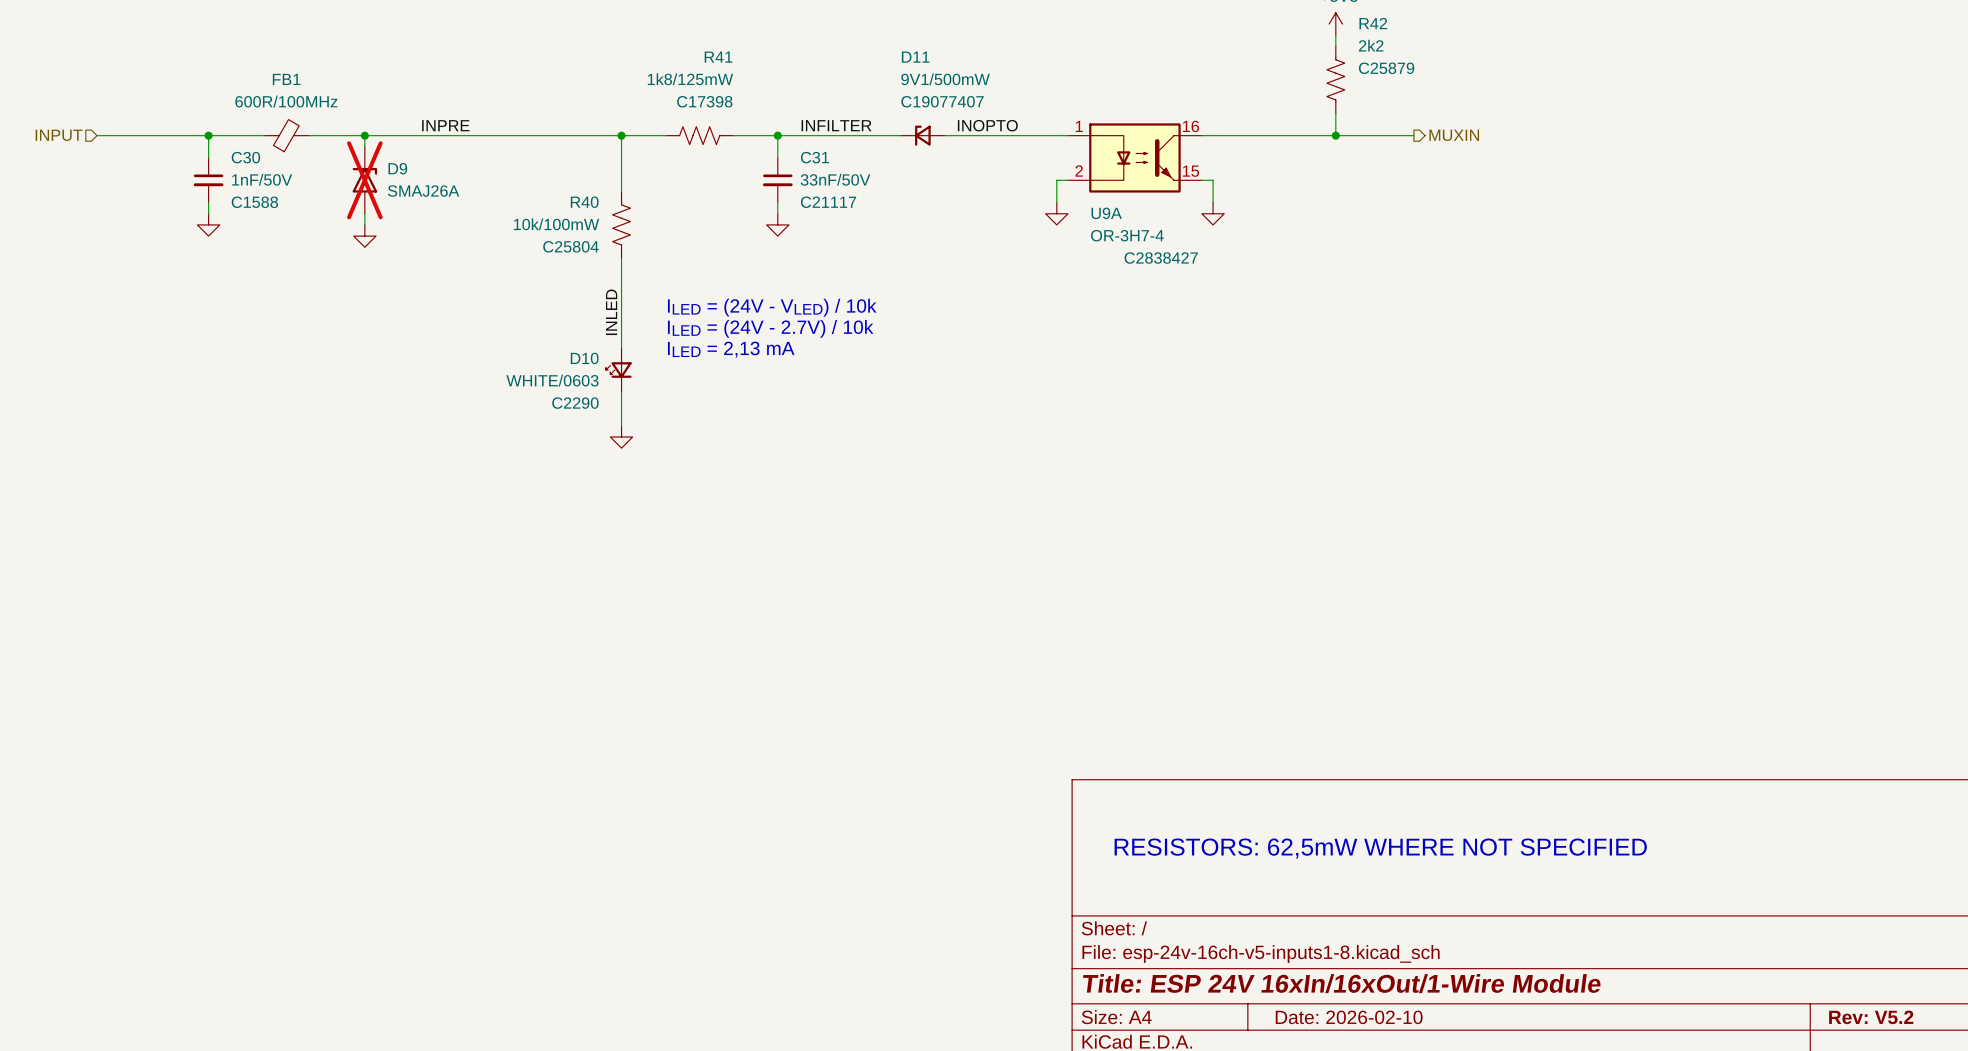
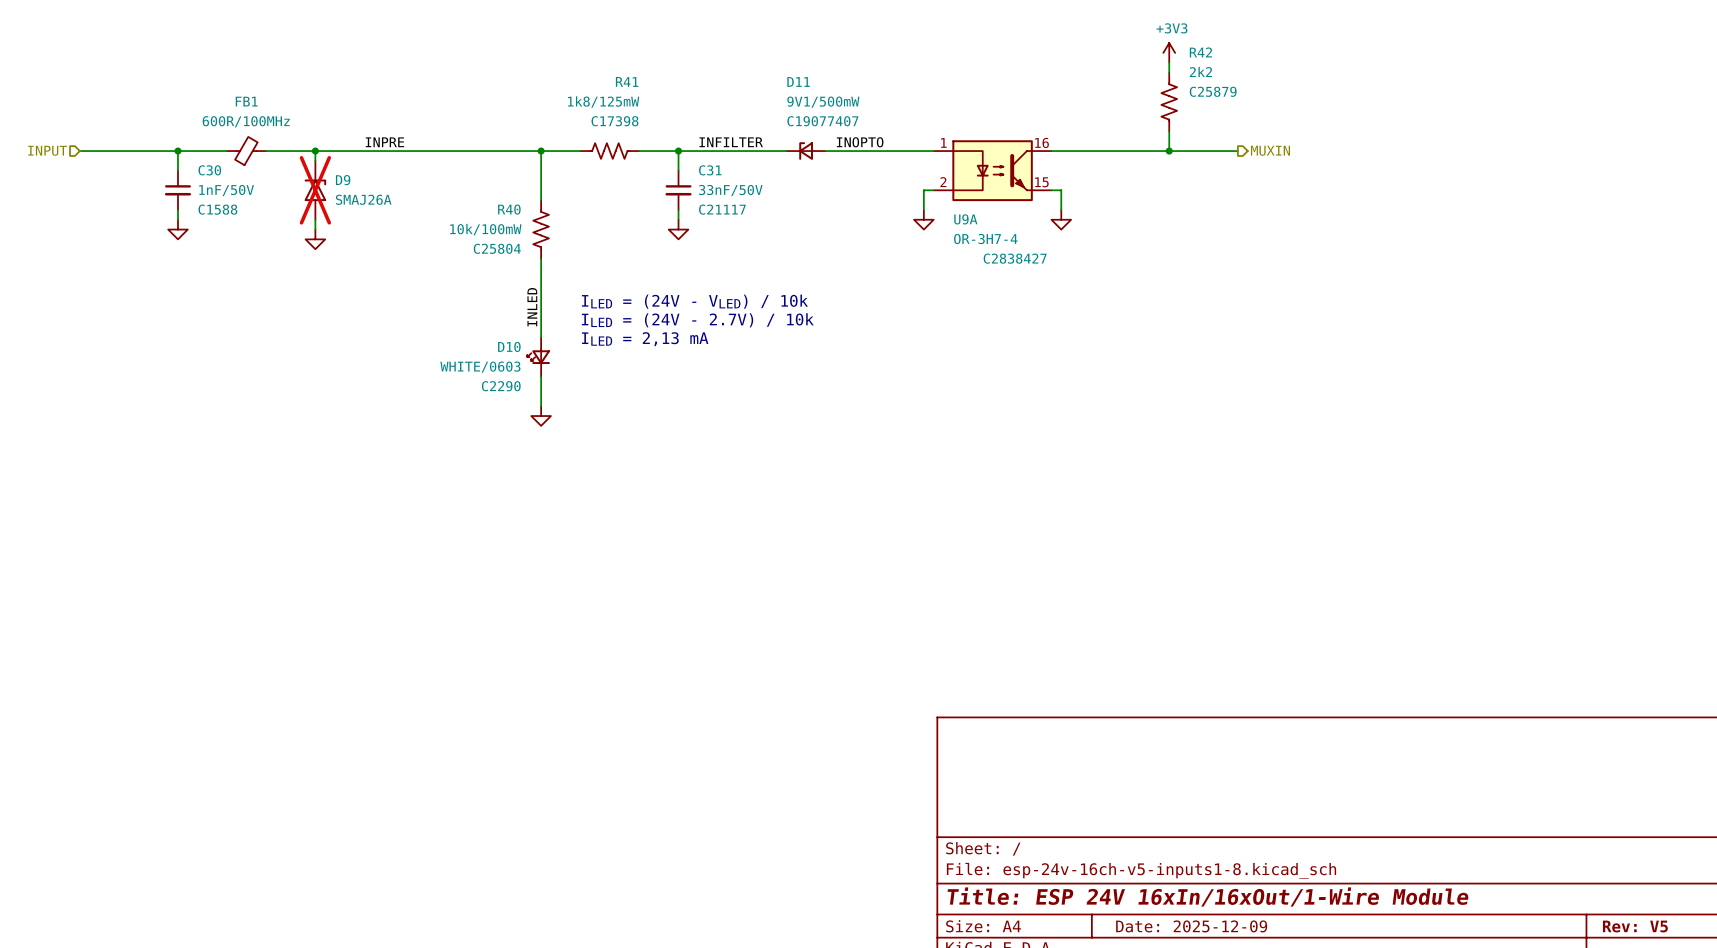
text: RESISTORS: 62,5mW WHERE NOT SPECIFIED (1380, 848) -> none
title block: Date: 2026-02-10 (1349, 1017) -> Date: 2025-12-09 (1191, 926)
title block: Rev: V5.2 (1871, 1017) -> Rev: V5 (1635, 926)

